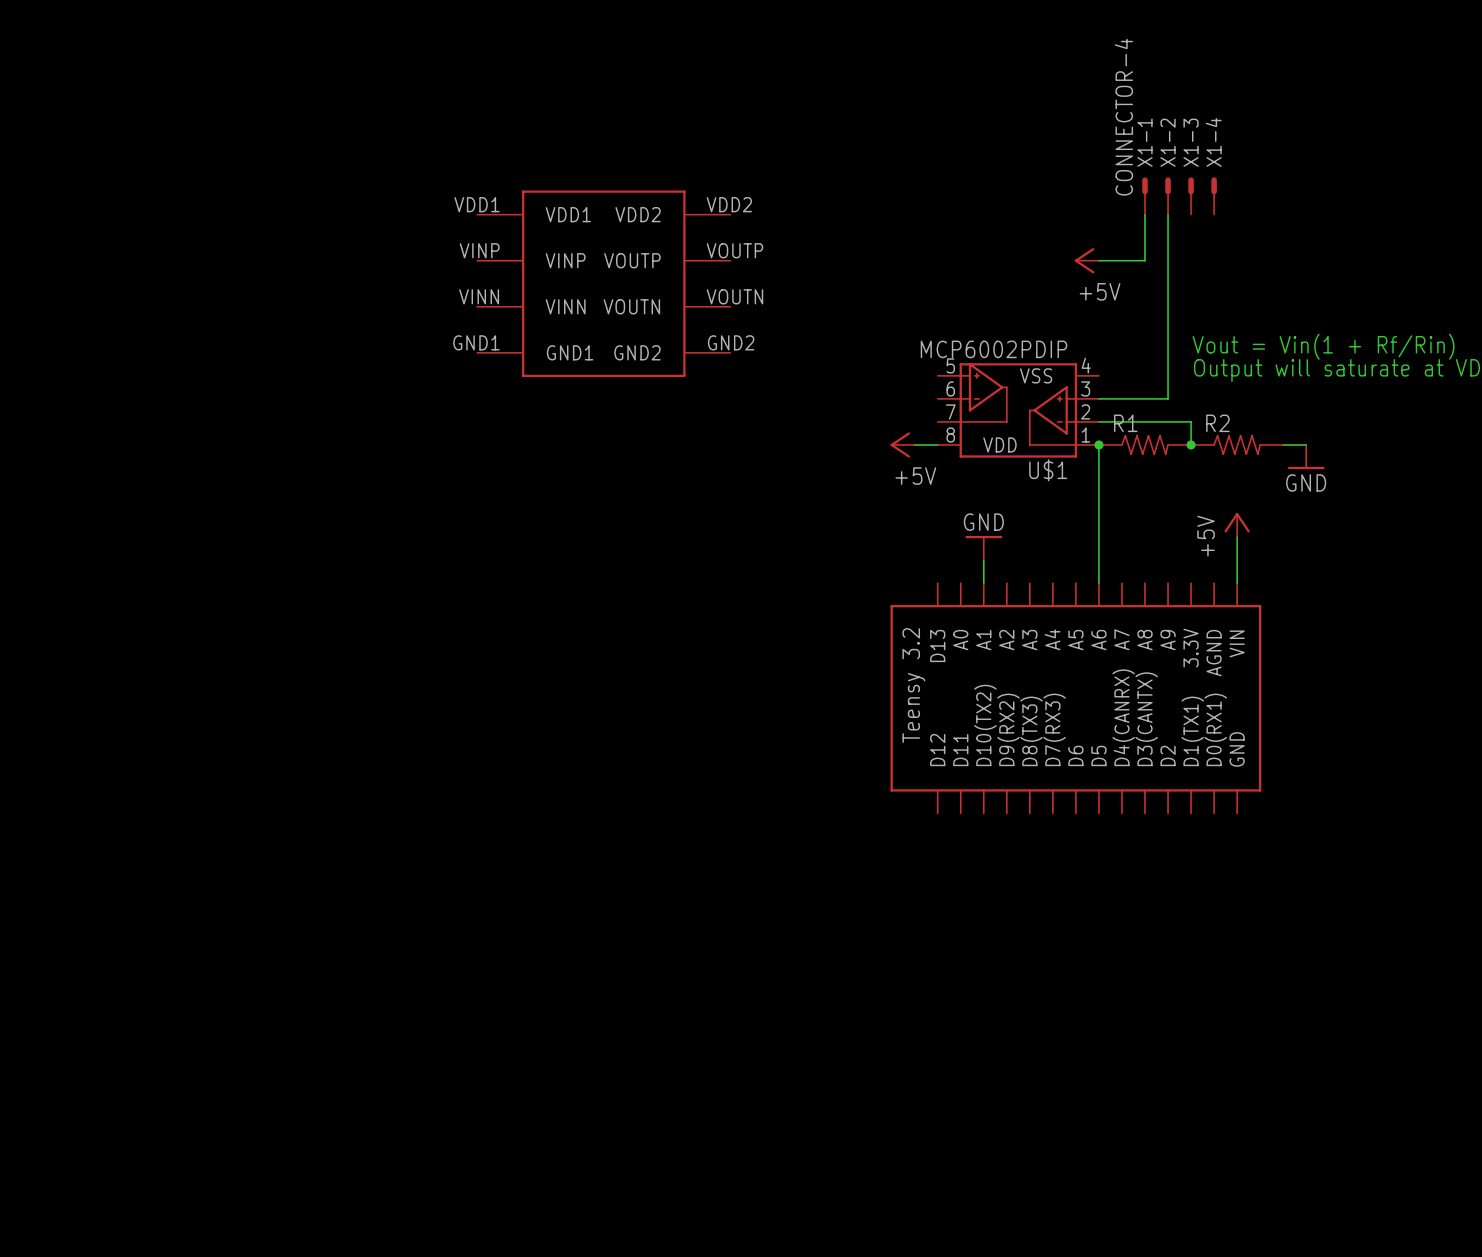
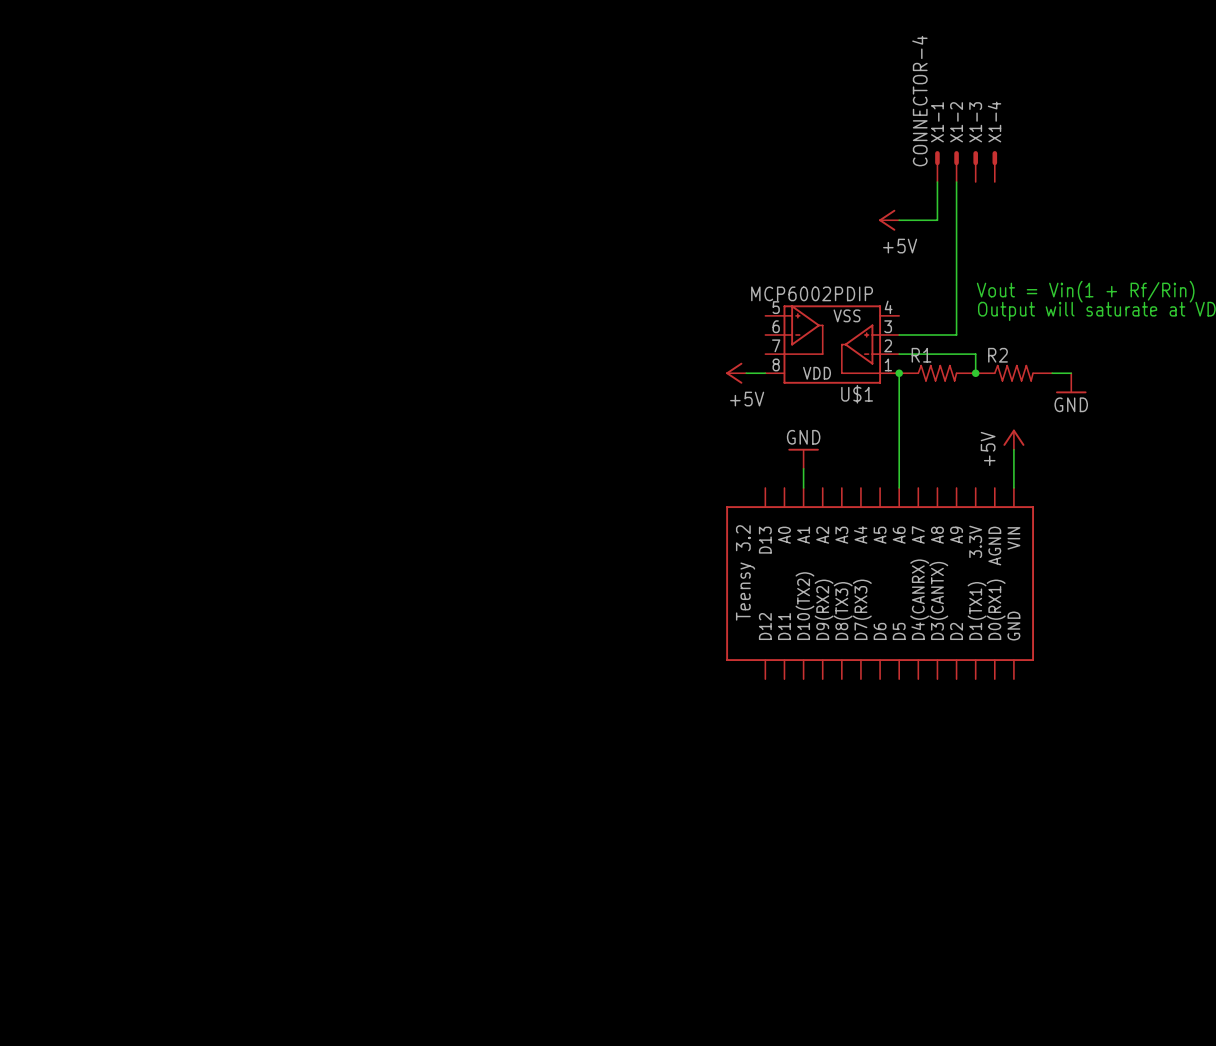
part: (603, 283) -> none

